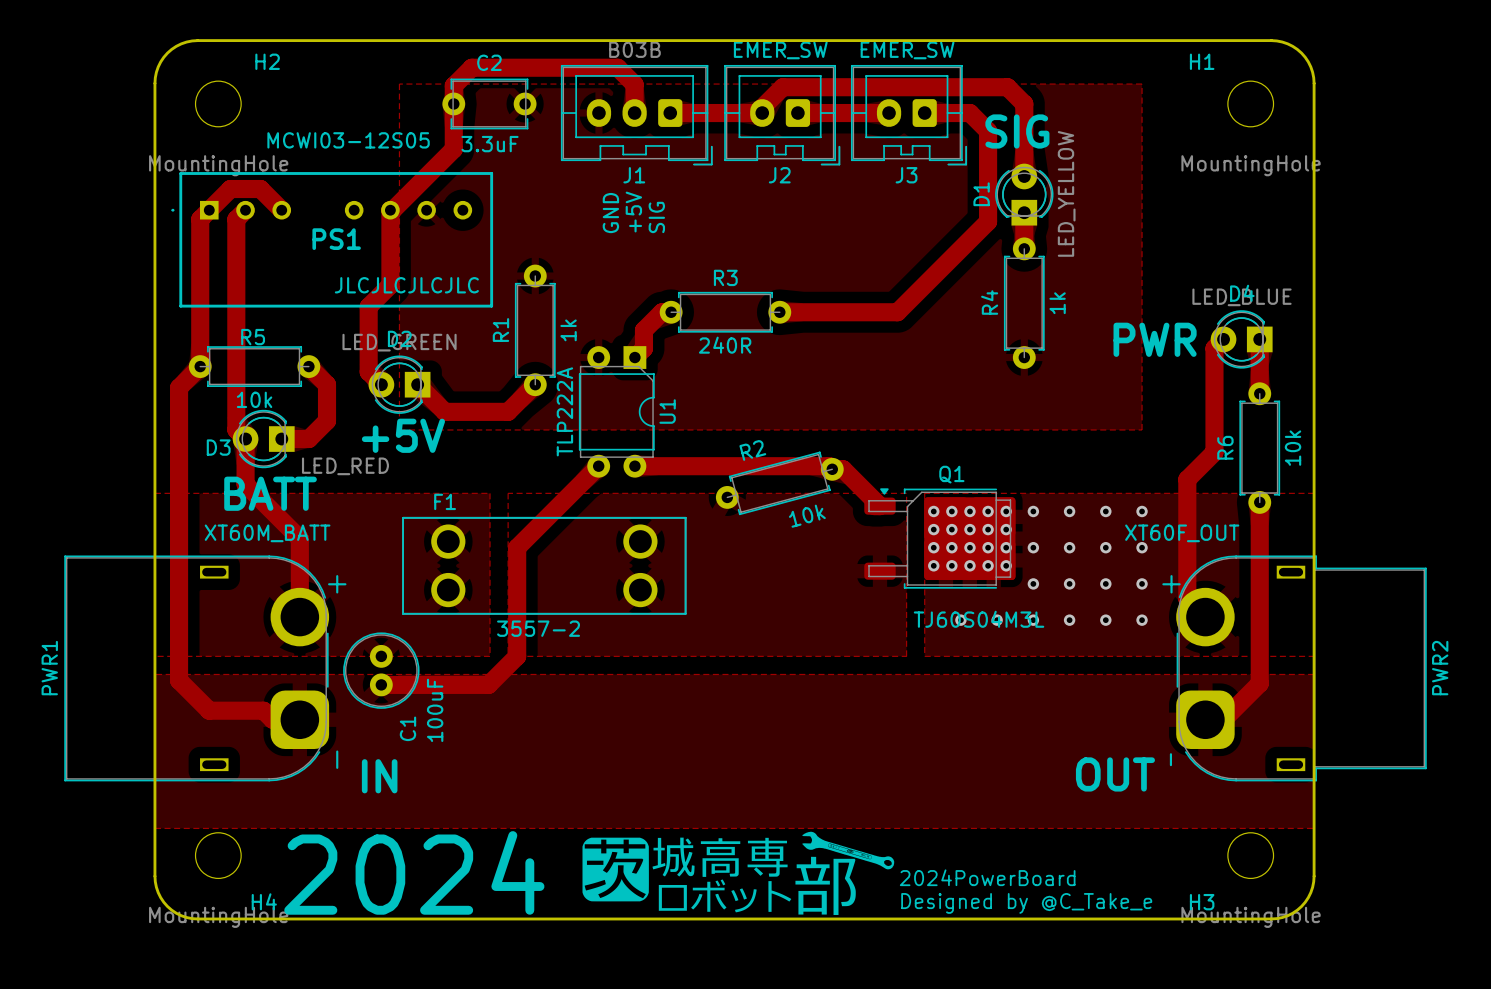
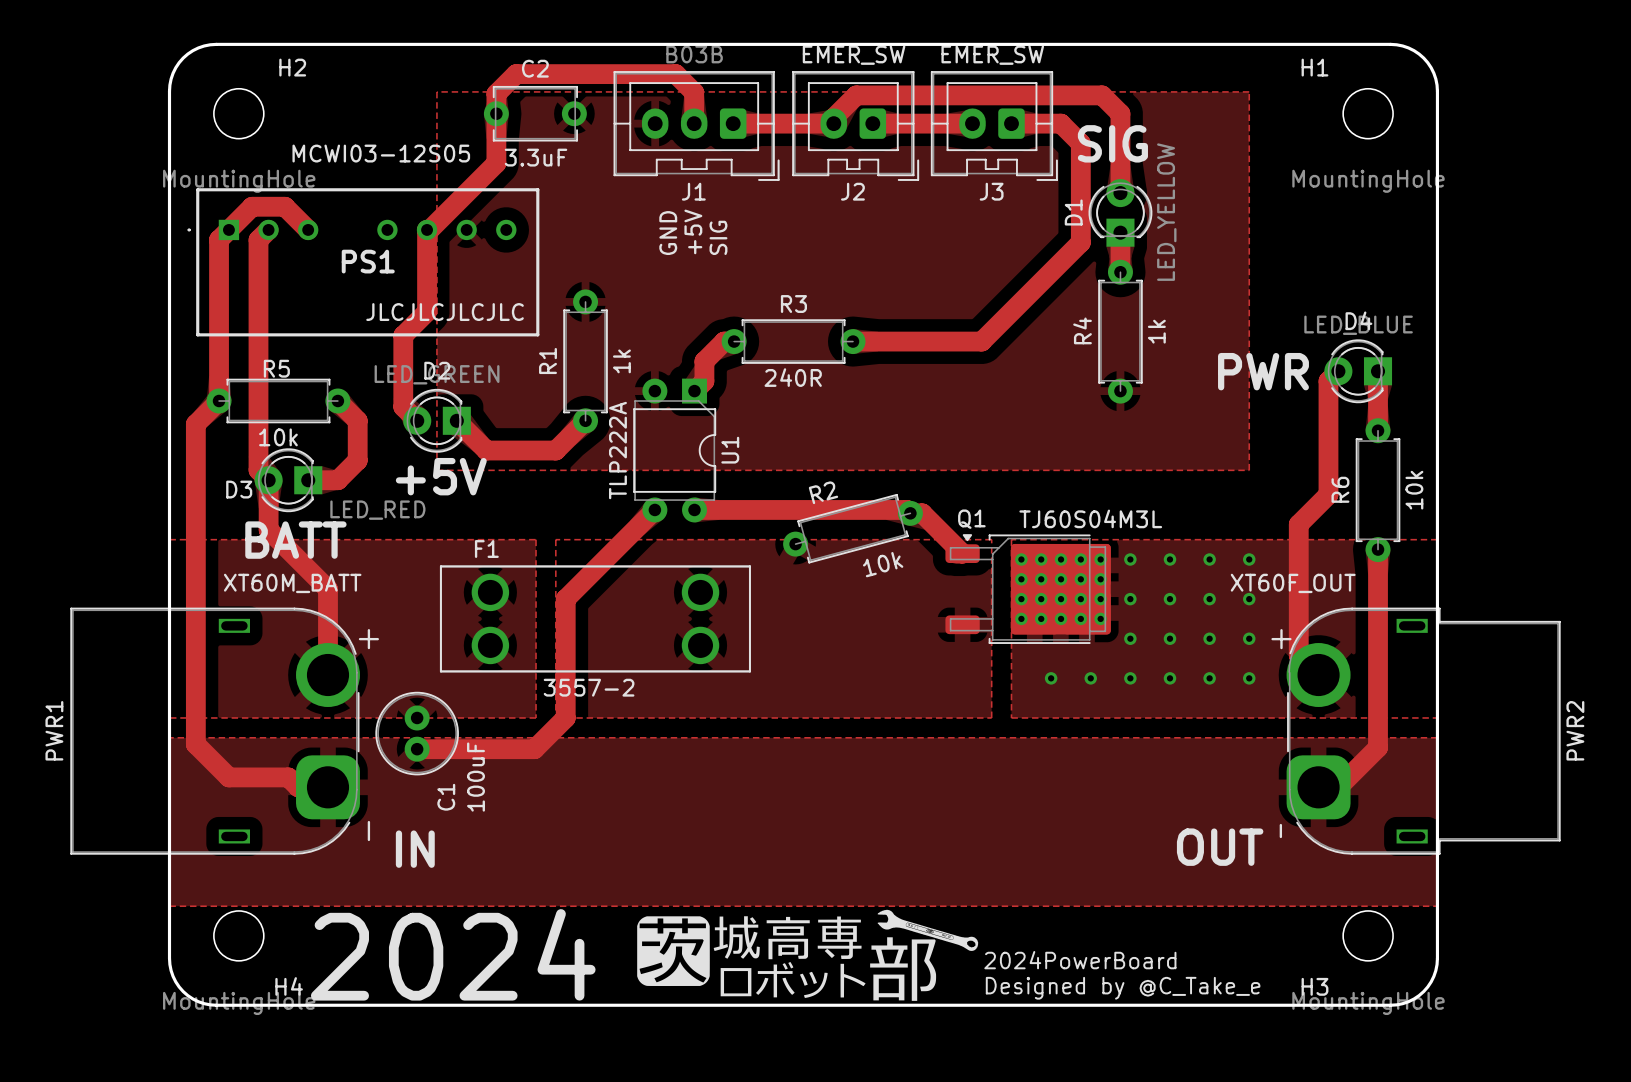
Q1 name position: Q1 (951, 474) -> Q1 (971, 519)
Q1 value position: TJ60S04M3L (979, 619) -> TJ60S04M3L (1090, 518)

